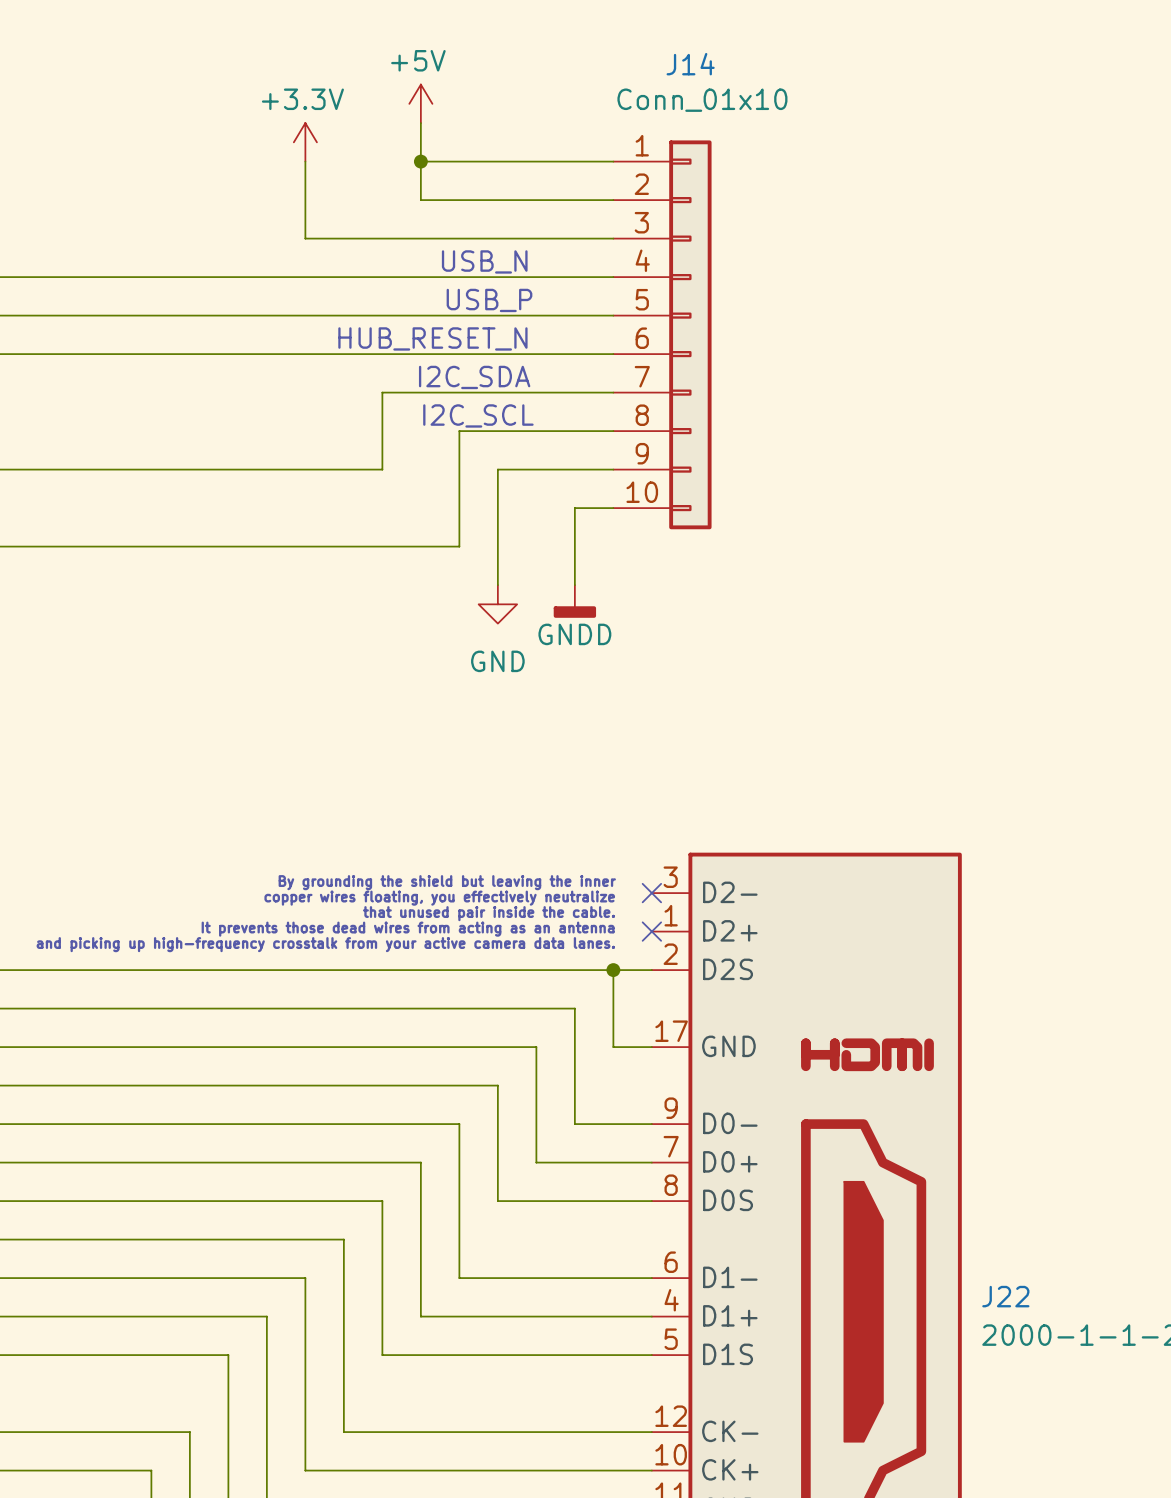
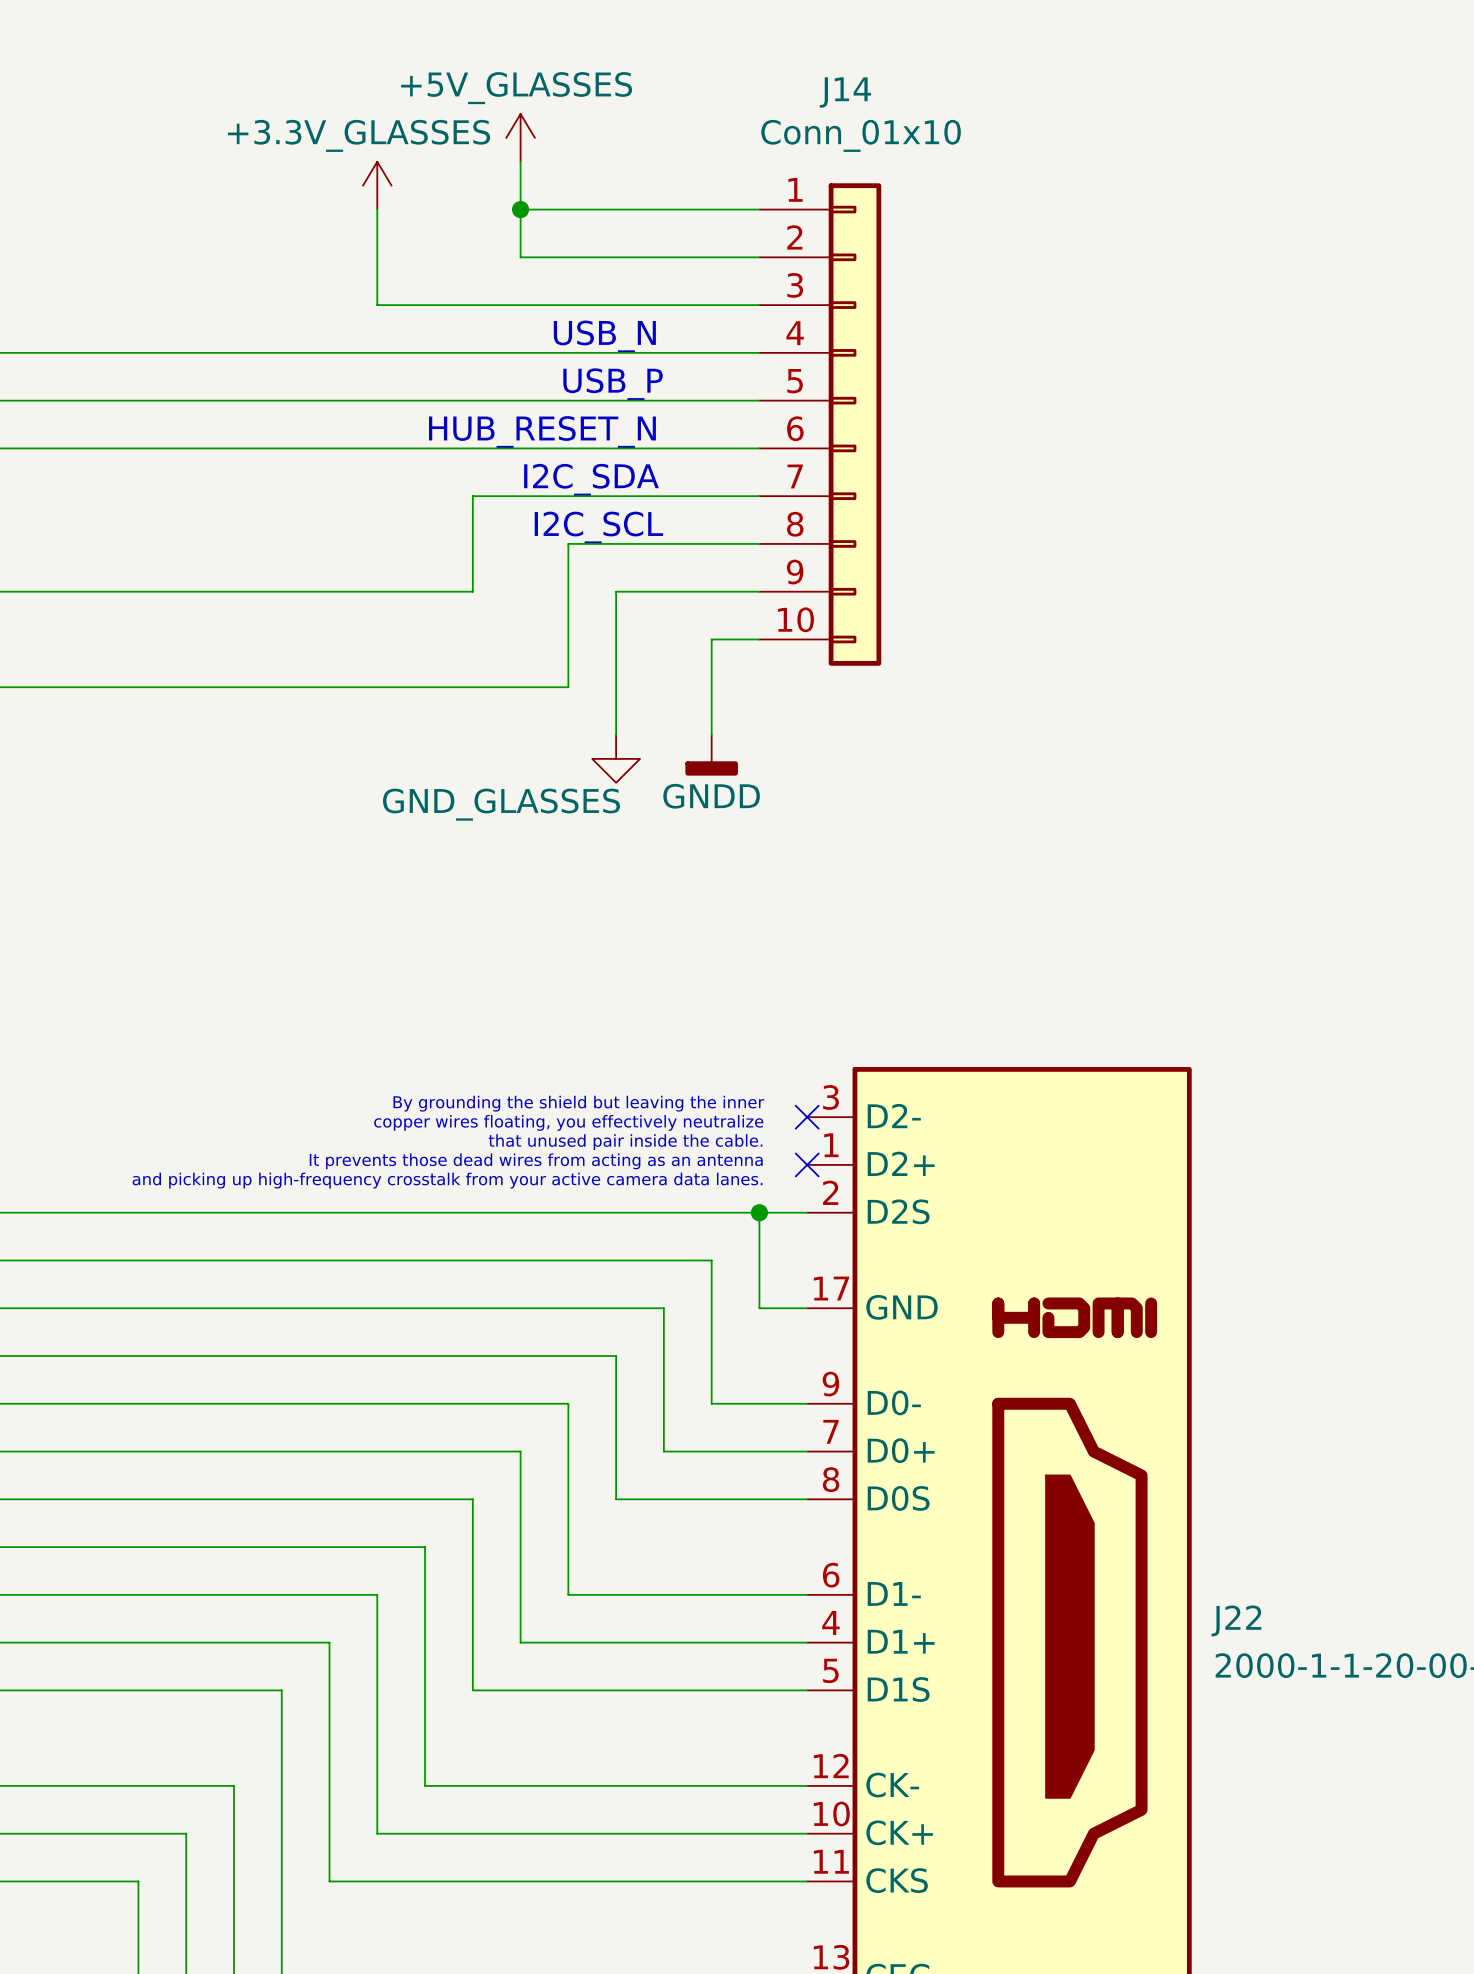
power symbol: +5V (420, 103) -> +5V_GLASSES (520, 137)
power symbol: +3.3V (305, 142) -> +3.3V_GLASSES (377, 185)
power symbol: GND (497, 604) -> GND_GLASSES (616, 758)

